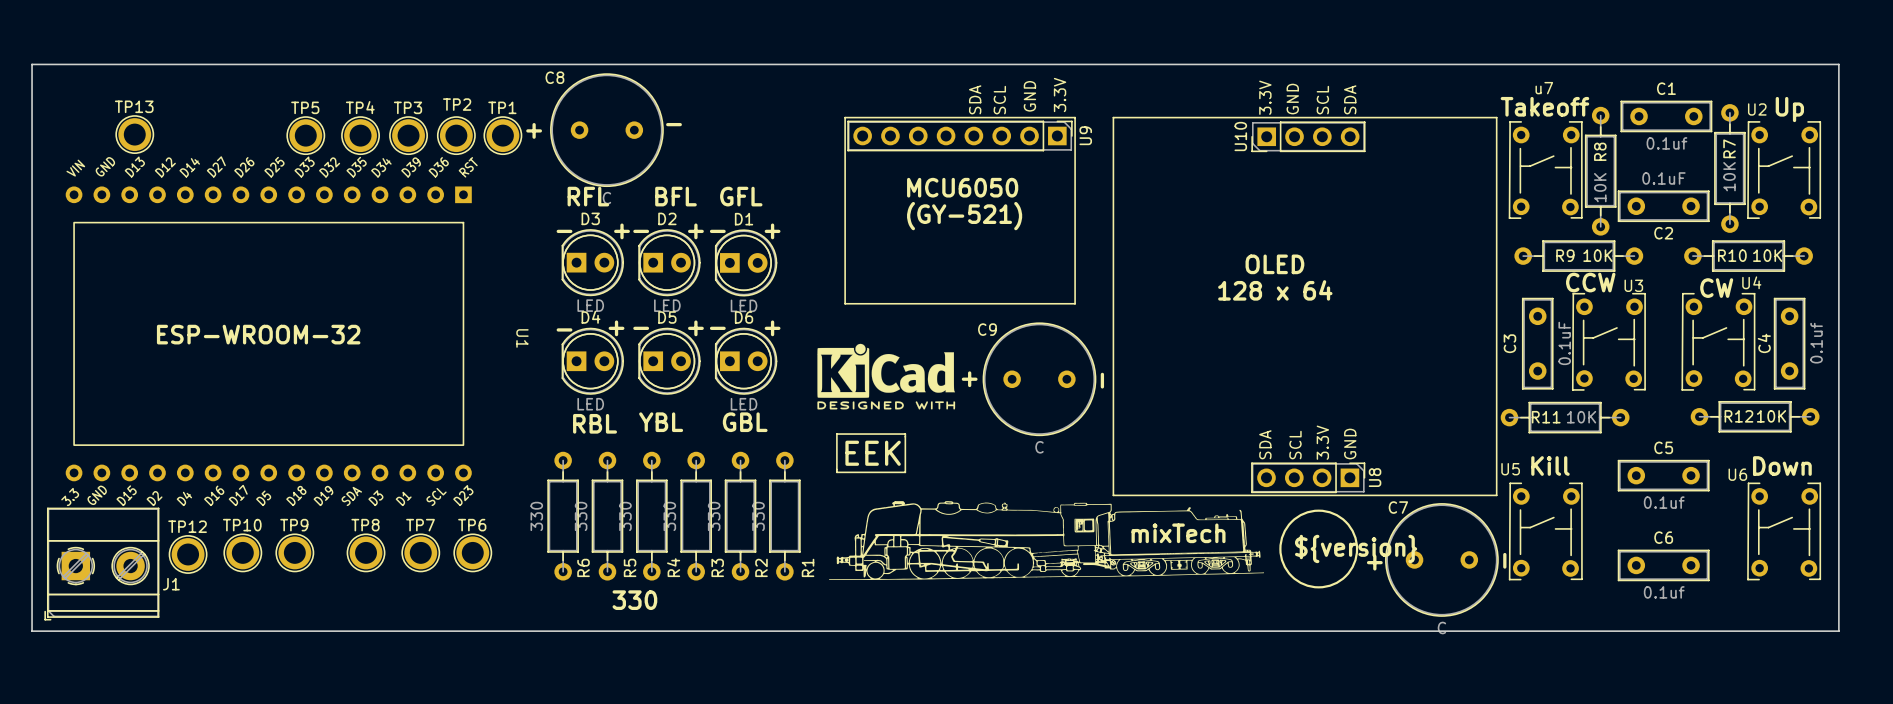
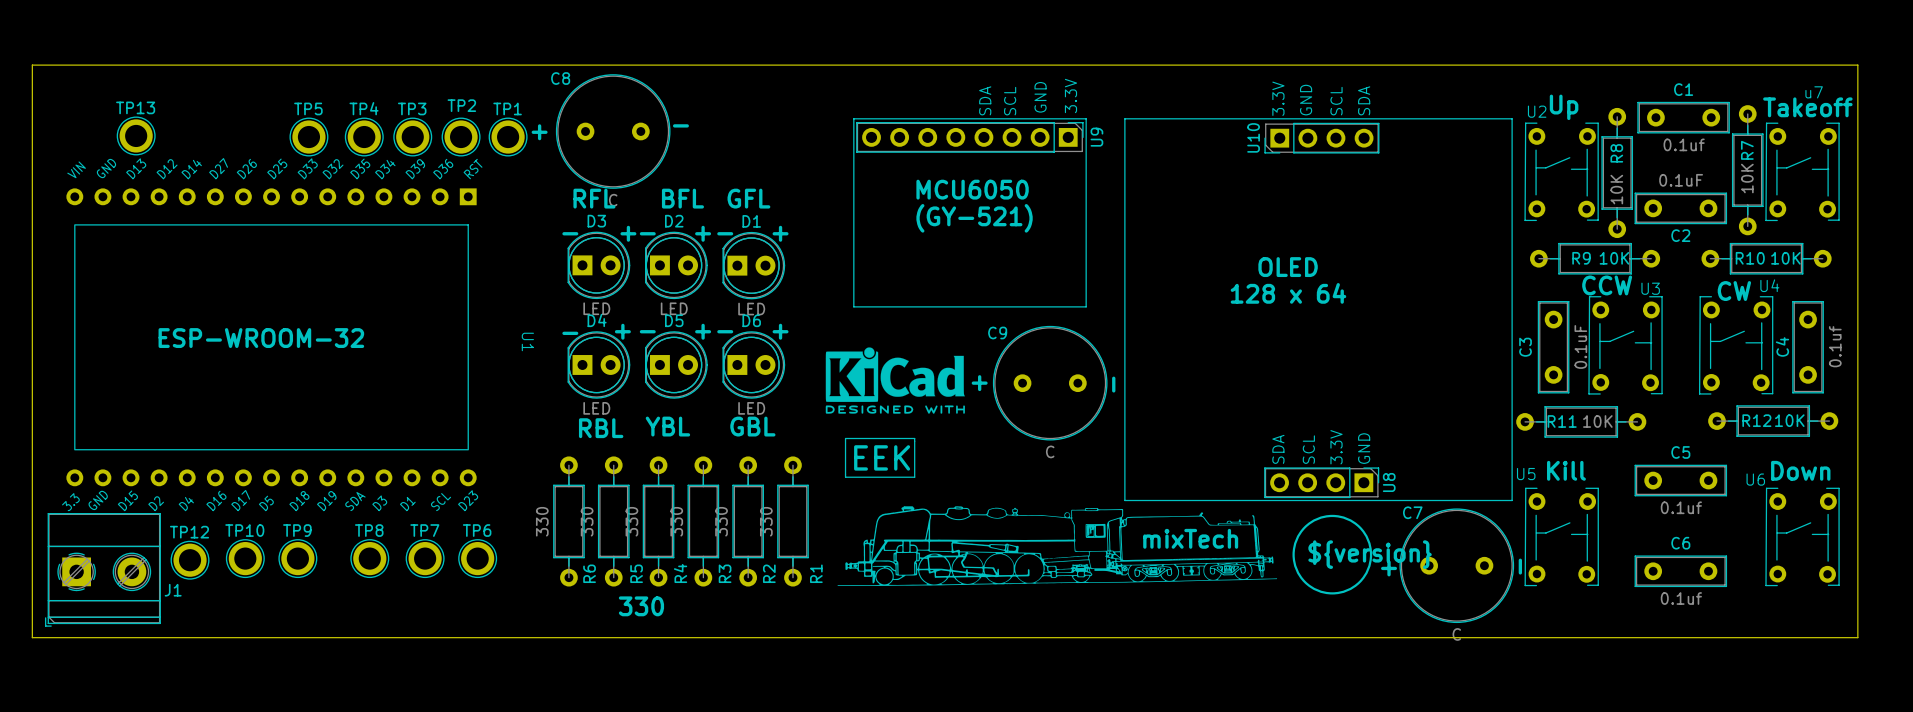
u7 name: u7 (1544, 88) -> U2 (1537, 111)
text position: Takeoff (1544, 106) -> Takeoff (1807, 107)
U2 name: U2 (1757, 109) -> u7 (1814, 92)
text position: Up (1789, 109) -> Up (1564, 107)

